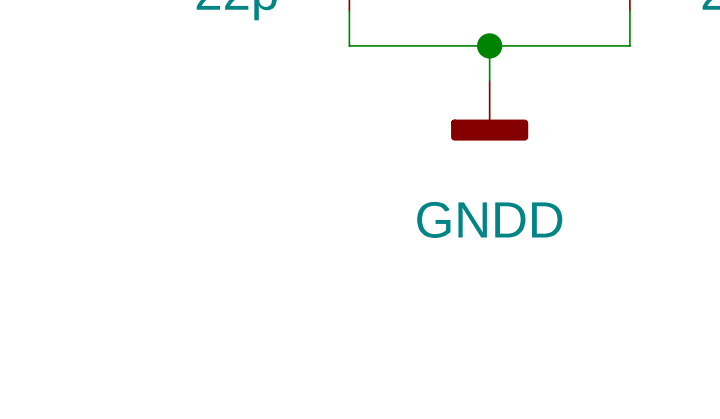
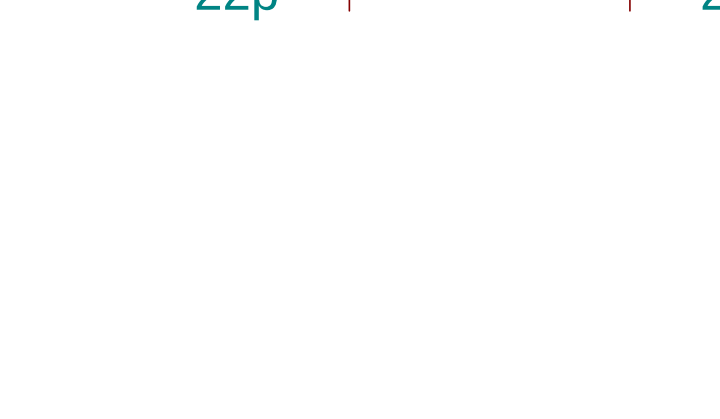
wire: (349, 10) (349, 45) (629, 45) (629, 10) -> none
wire: (489, 45) (489, 80) -> none
junction: (489, 45) -> none
power symbol: GNDD (489, 110) -> none

